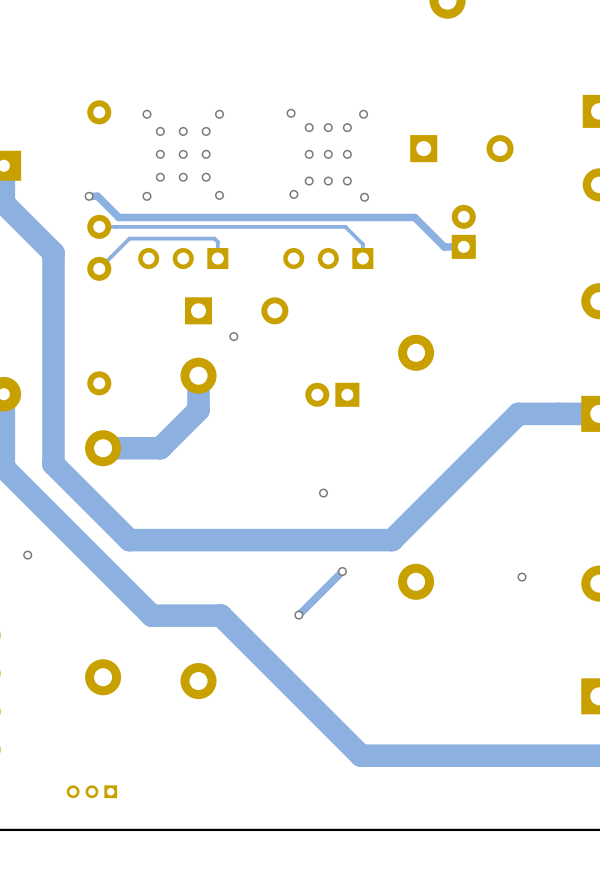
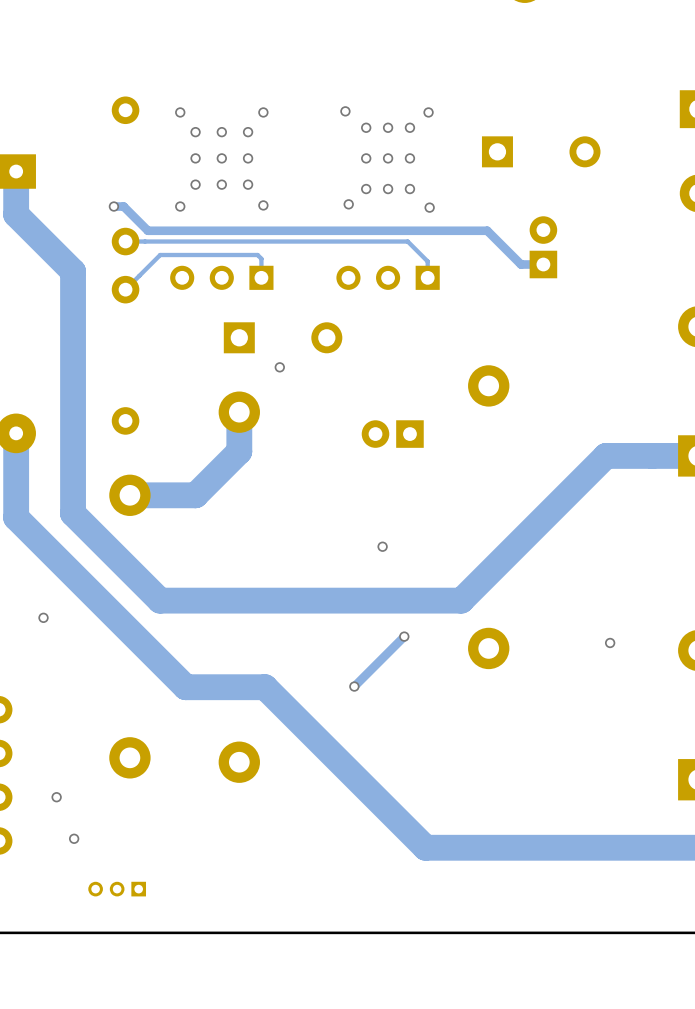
via: none -> (56, 797)
via: none -> (74, 838)

